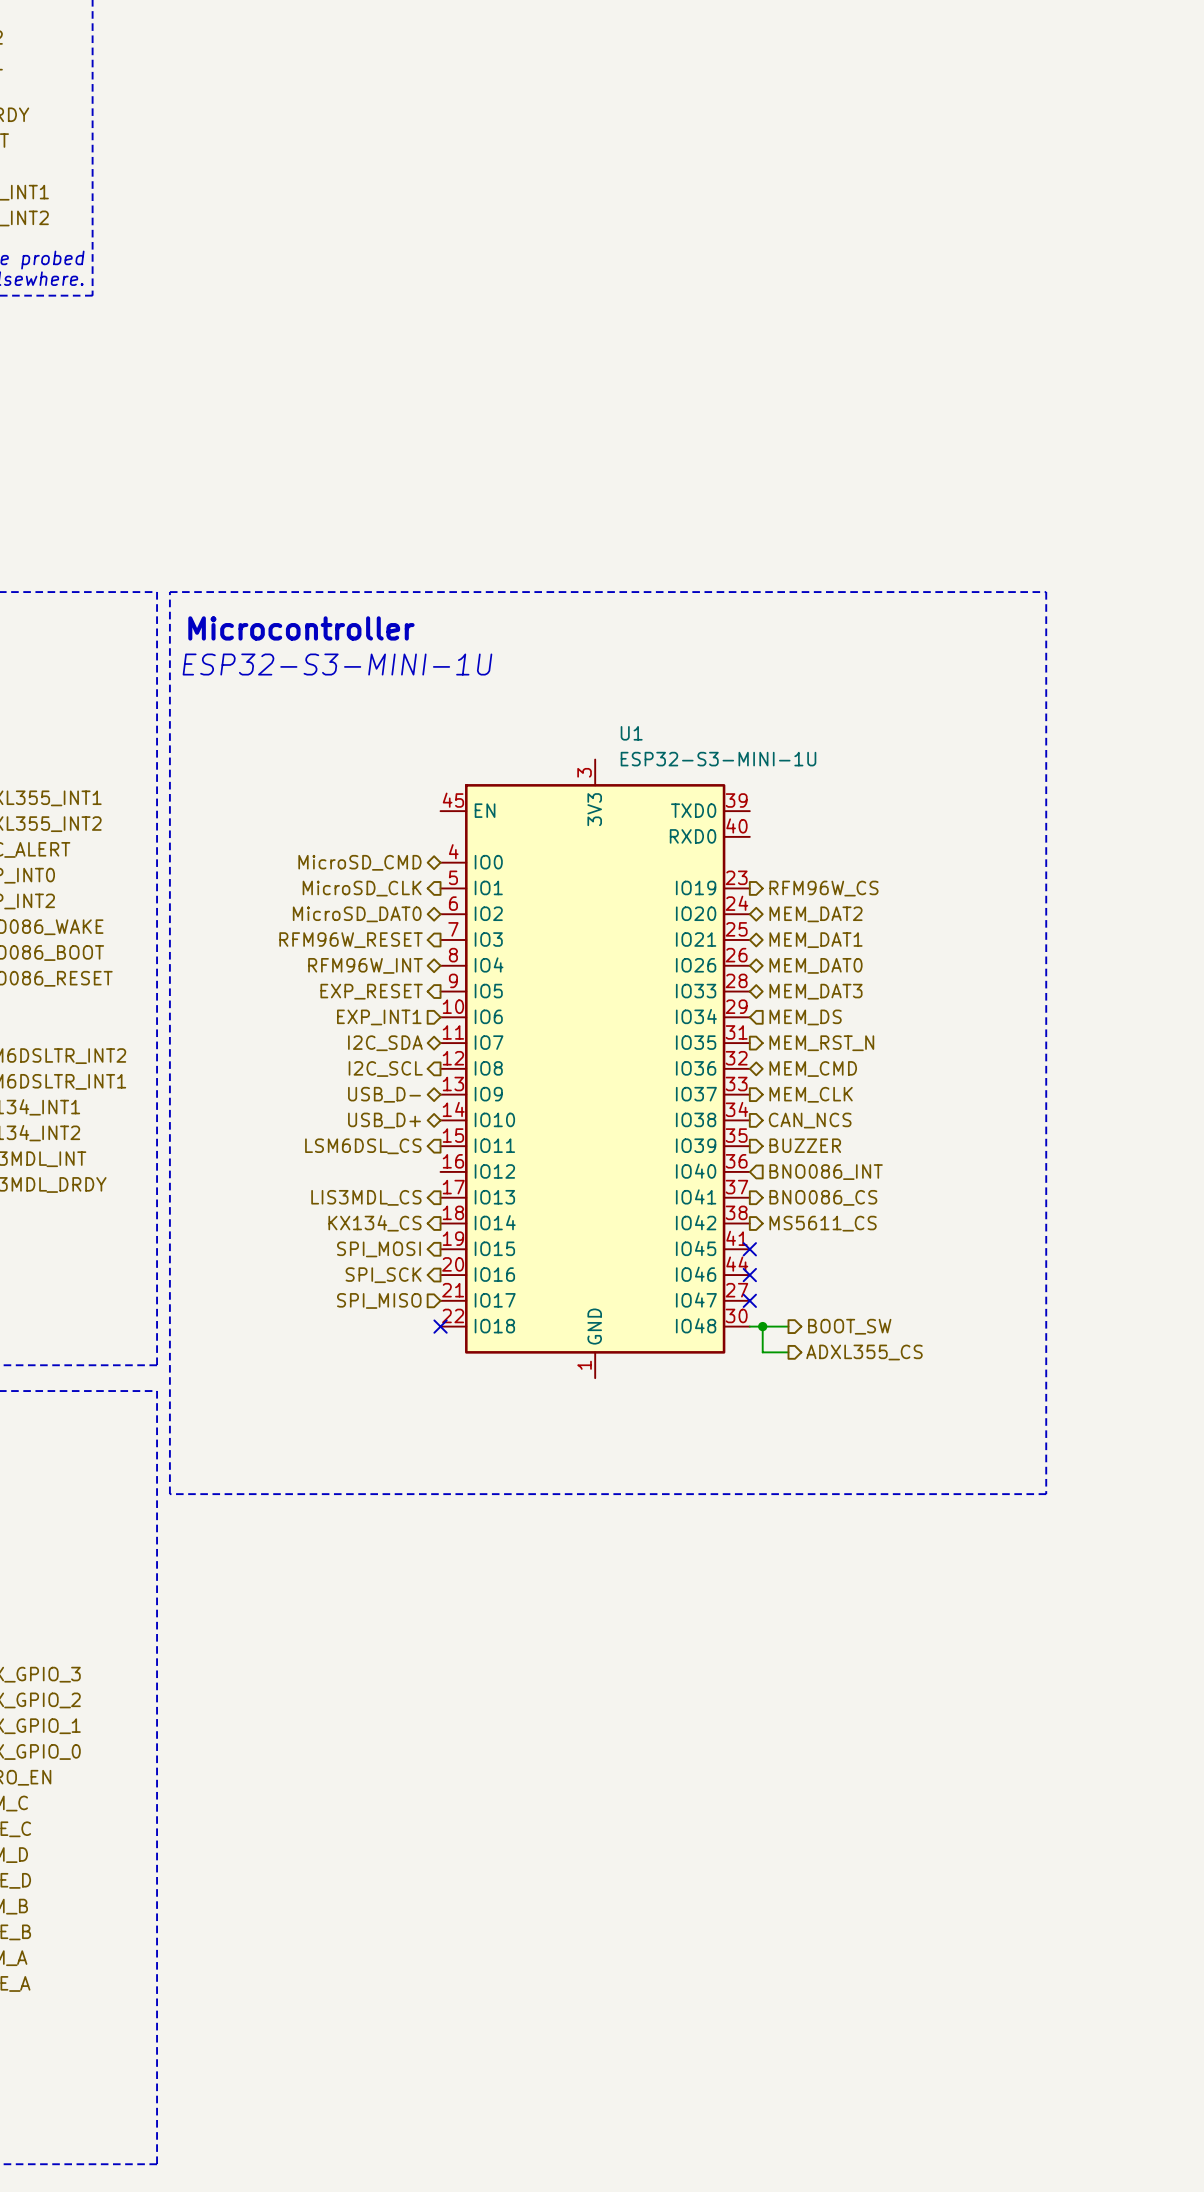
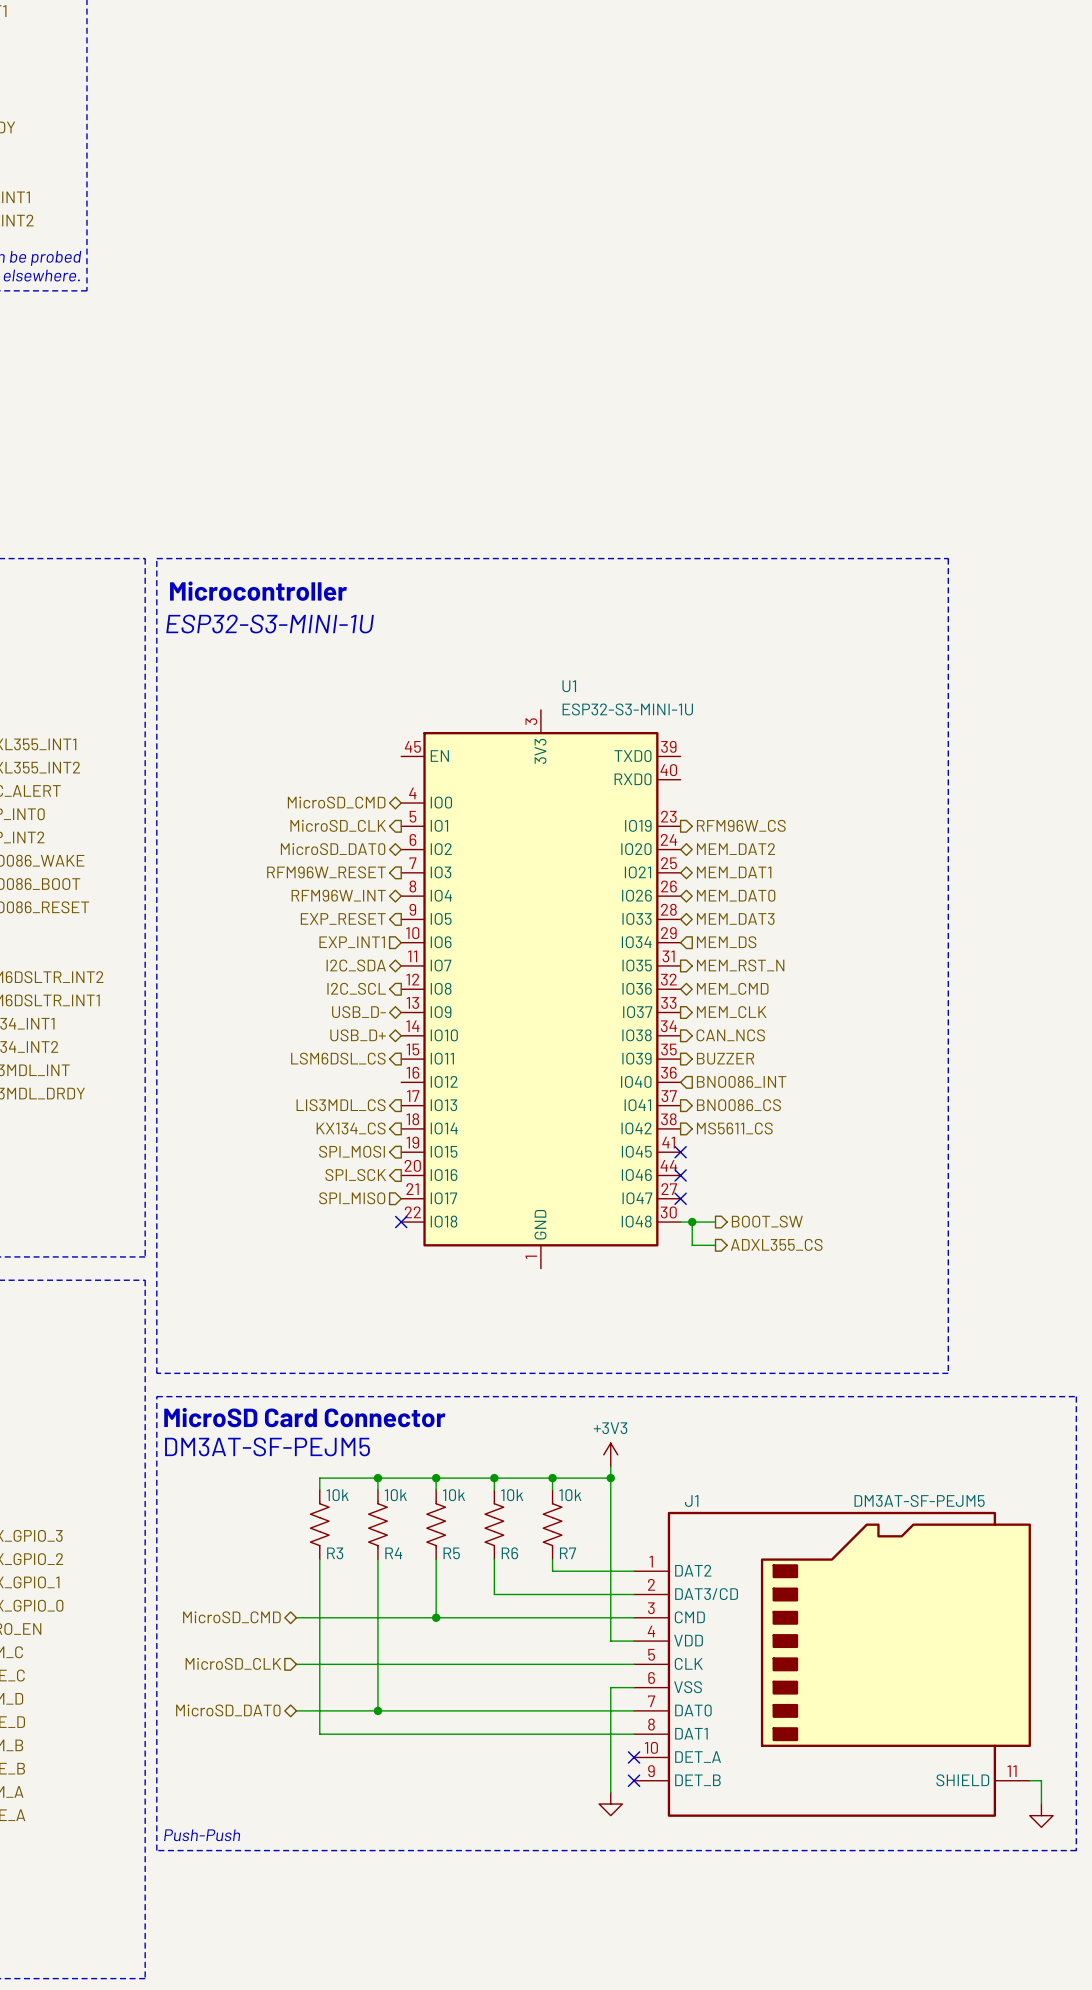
line: none -> (156, 1396) (1076, 1396) (1076, 1850) (156, 1850) (156, 1396)
text: none -> MicroSD Card Connector (304, 1417)
text: none -> DM3AT-SF-PEJM5 (267, 1446)
power symbol: none -> +3V3 (610, 1454)
wire: none -> (610, 1466) (610, 1641) (634, 1641)
wire: none -> (377, 1478) (377, 1489)
junction: none -> (377, 1478)
wire: none -> (436, 1478) (436, 1489)
junction: none -> (436, 1478)
wire: none -> (494, 1478) (494, 1489)
junction: none -> (494, 1478)
wire: none -> (552, 1478) (552, 1489)
junction: none -> (552, 1478)
wire: none -> (610, 1478) (319, 1478) (319, 1489)
junction: none -> (610, 1478)
R3: none -> 10k (319, 1524)
R4: none -> 10k (377, 1524)
R5: none -> 10k (436, 1524)
R6: none -> 10k (494, 1524)
R7: none -> 10k (552, 1524)
wire: none -> (319, 1559) (319, 1734) (634, 1734)
wire: none -> (377, 1559) (377, 1710)
wire: none -> (436, 1559) (436, 1617)
wire: none -> (494, 1559) (494, 1594) (634, 1594)
wire: none -> (552, 1559) (552, 1571) (634, 1571)
hierarchical label: none -> MicroSD_CMD (231, 1617)
wire: none -> (296, 1617) (634, 1617)
junction: none -> (436, 1617)
hierarchical label: none -> MicroSD_CLK (233, 1663)
wire: none -> (296, 1664) (634, 1664)
J1: none -> DM3AT-SF-PEJM5 (832, 1664)
wire: none -> (634, 1687) (610, 1687) (610, 1792)
hierarchical label: none -> MicroSD_DAT0 (228, 1710)
wire: none -> (296, 1710) (634, 1710)
junction: none -> (377, 1710)
no-connect mark: none -> (634, 1757)
no-connect mark: none -> (634, 1780)
wire: none -> (1029, 1780) (1041, 1780) (1041, 1804)
power symbol: none -> (610, 1804)
power symbol: none -> (1041, 1815)
text: none -> Push-Push (202, 1835)

